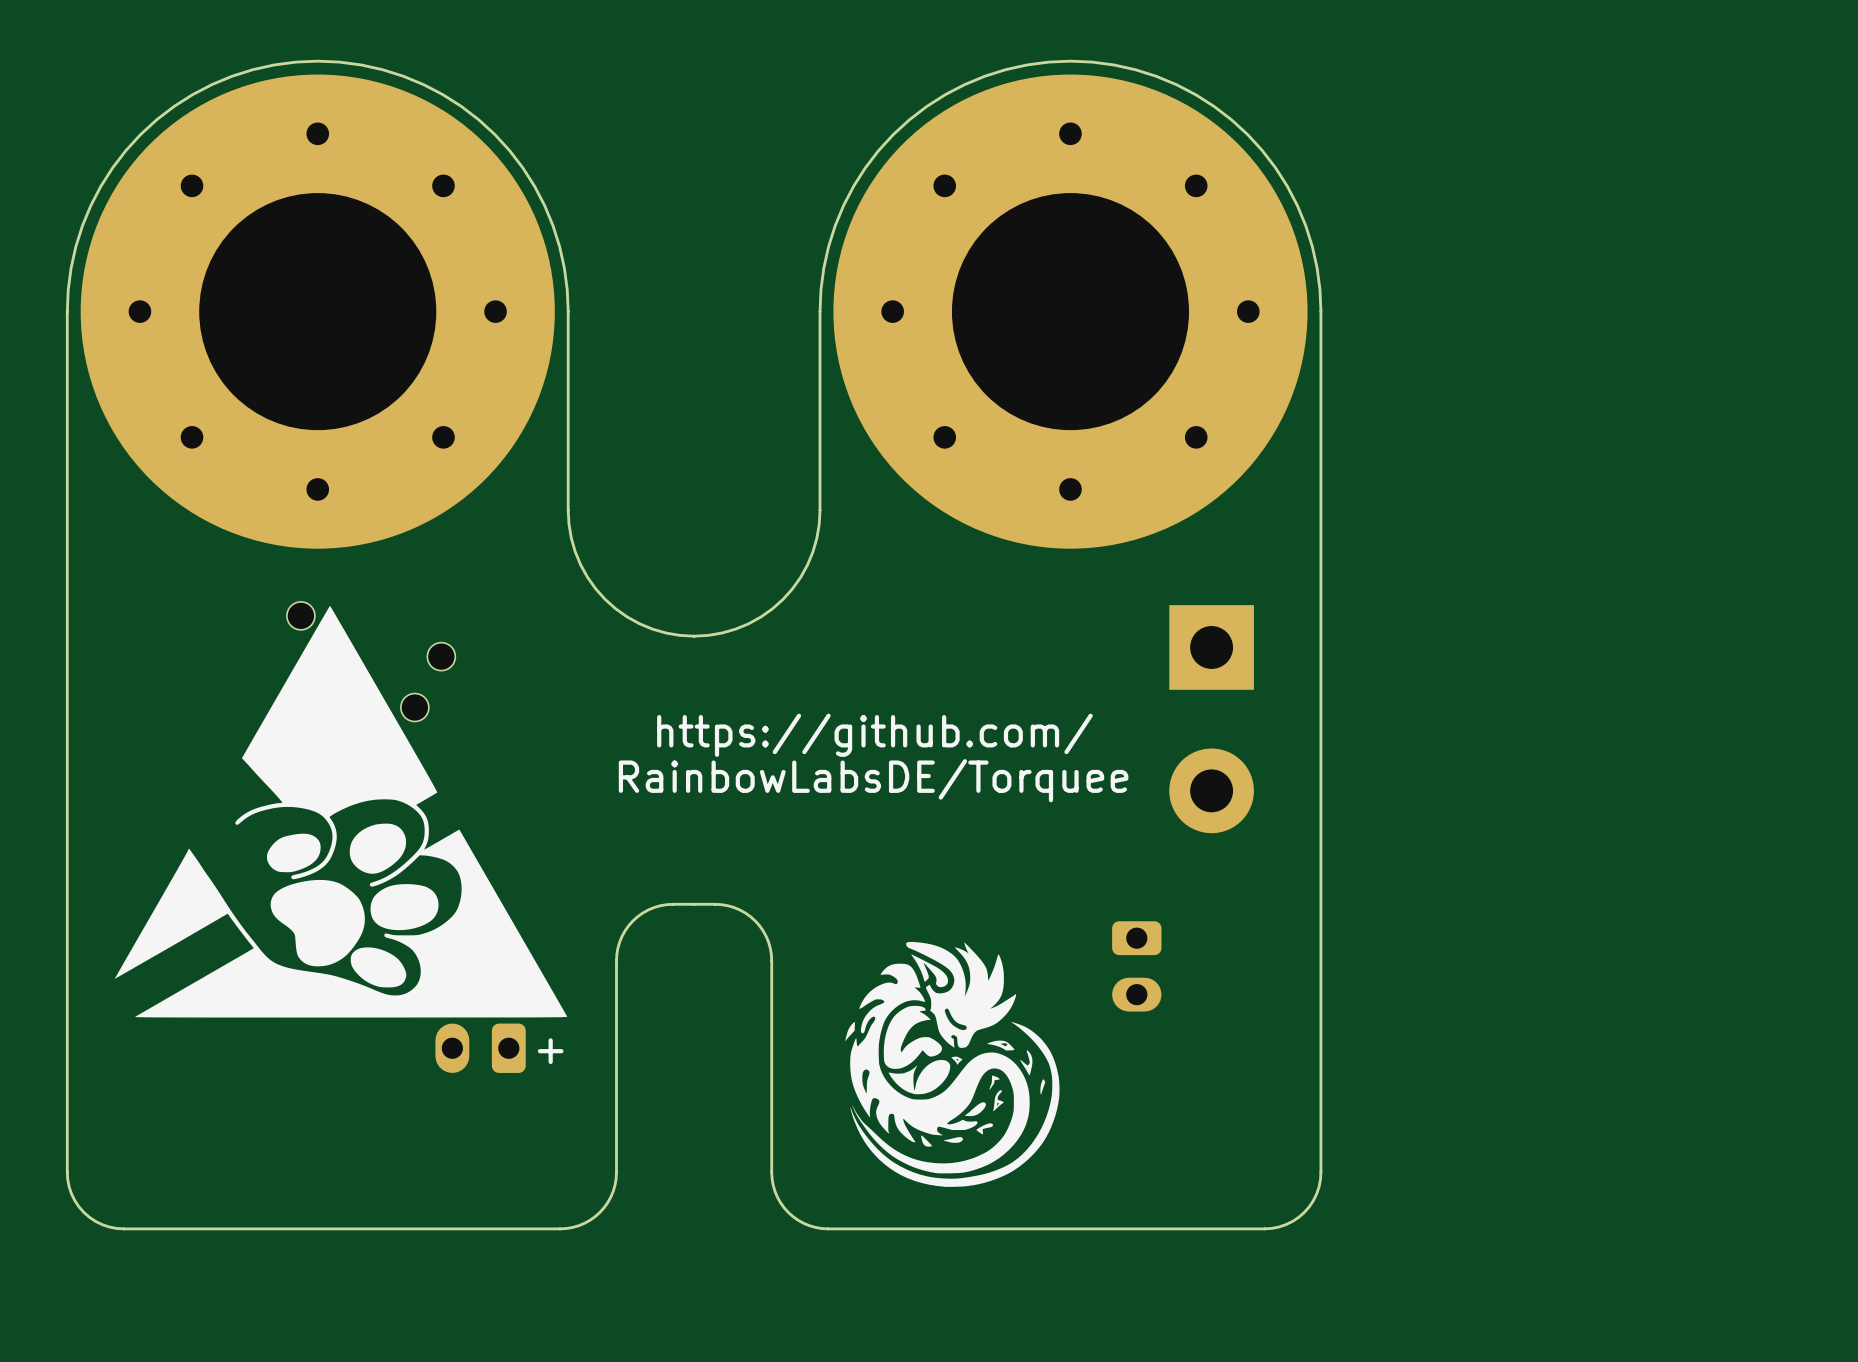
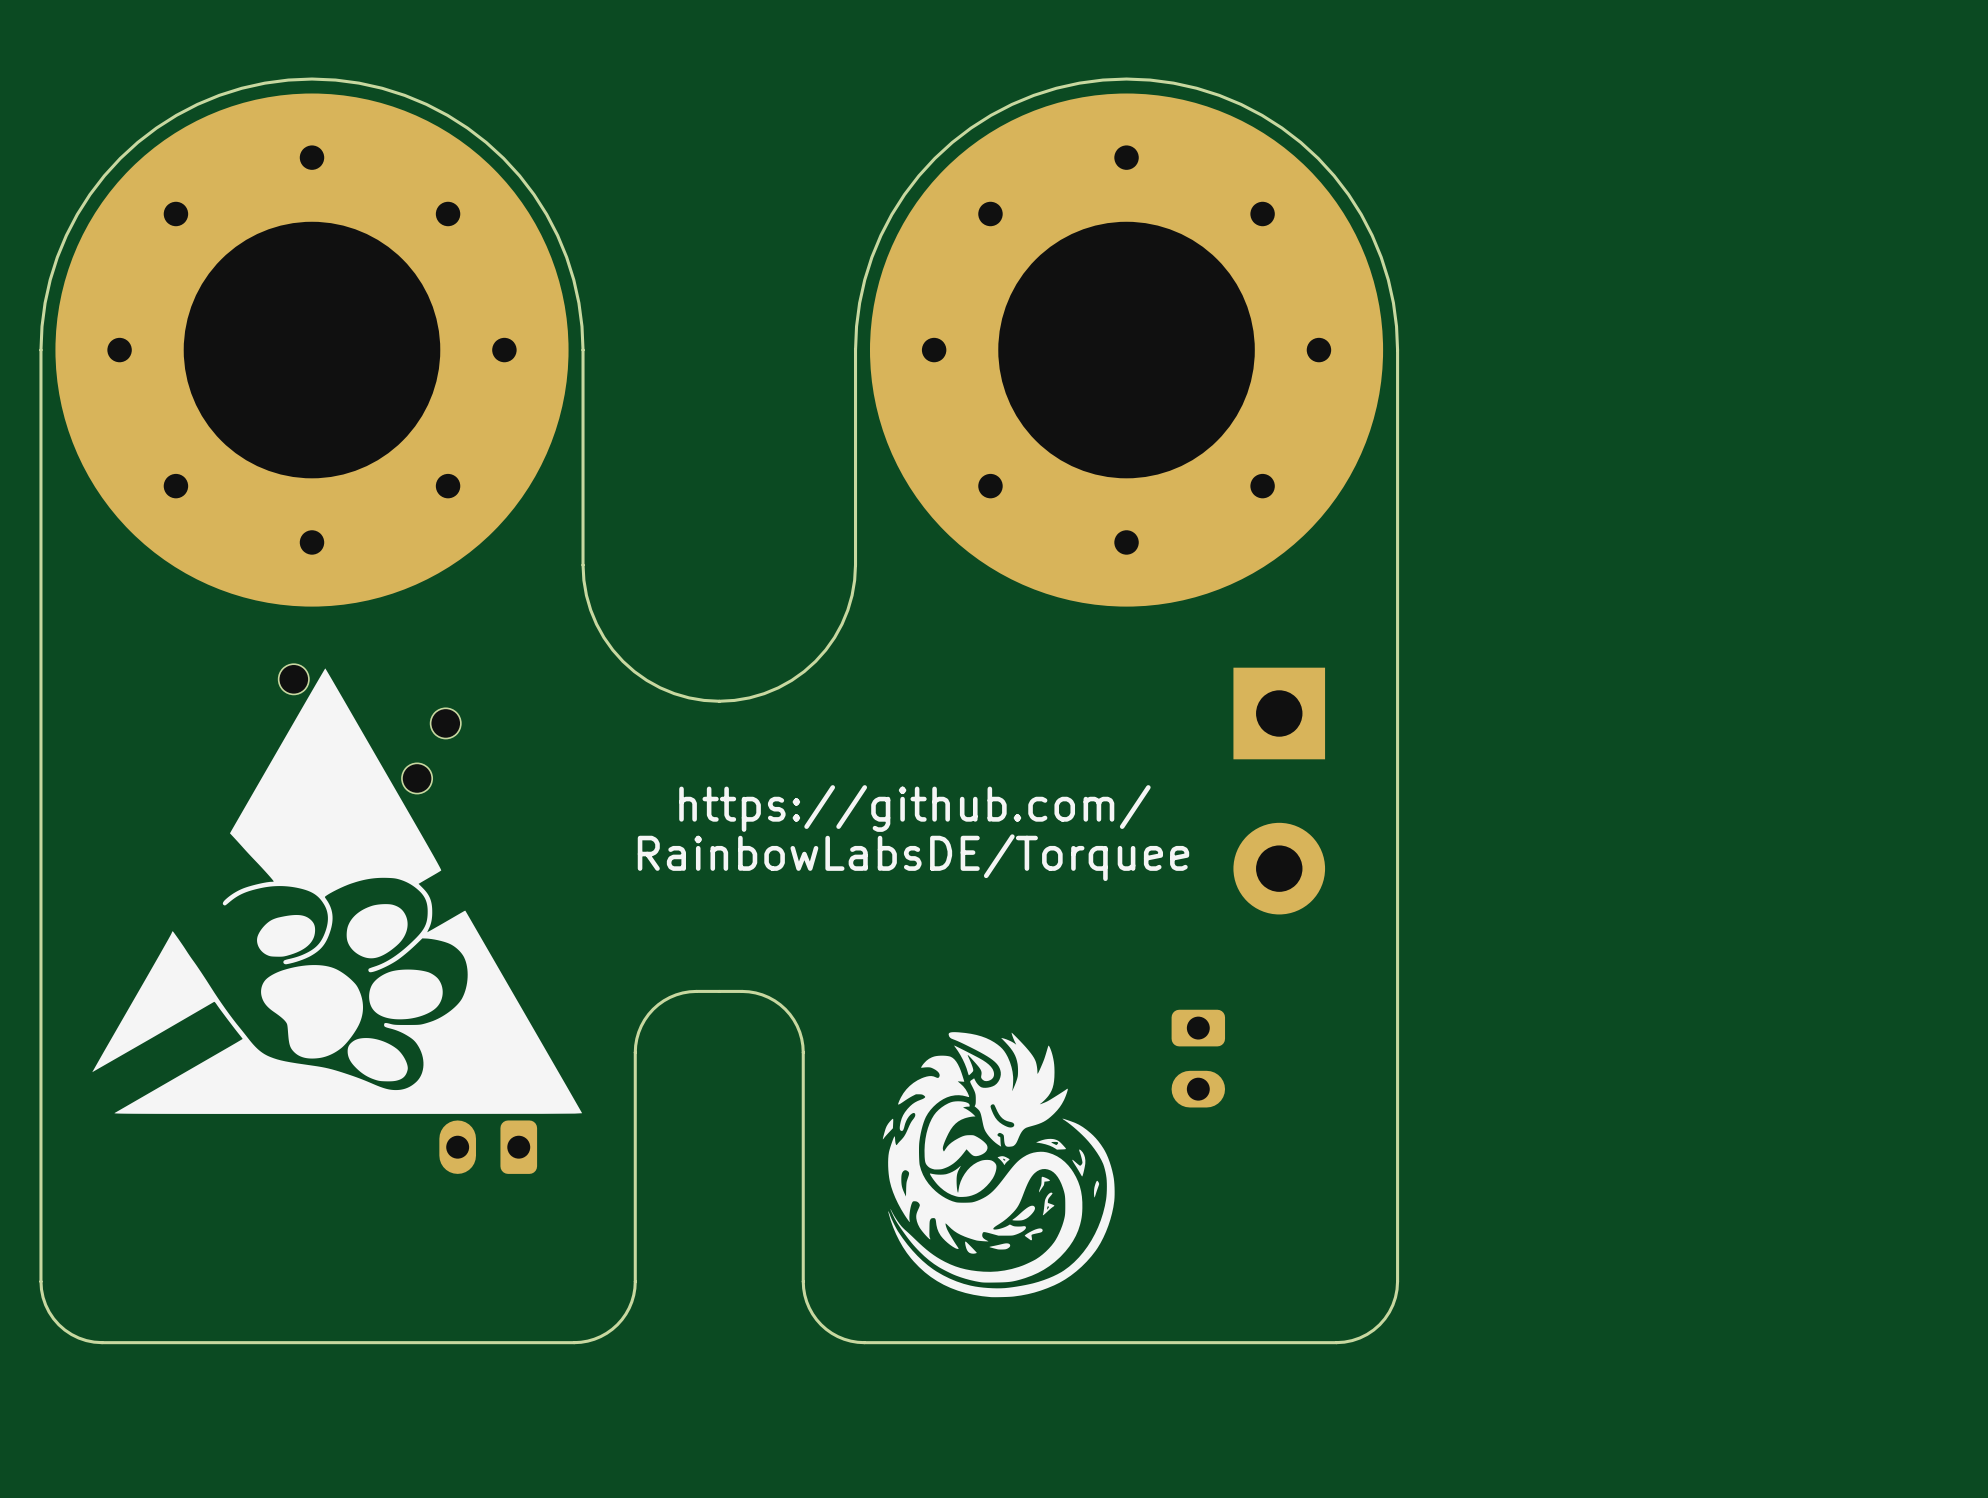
text: + (550, 1051) -> none

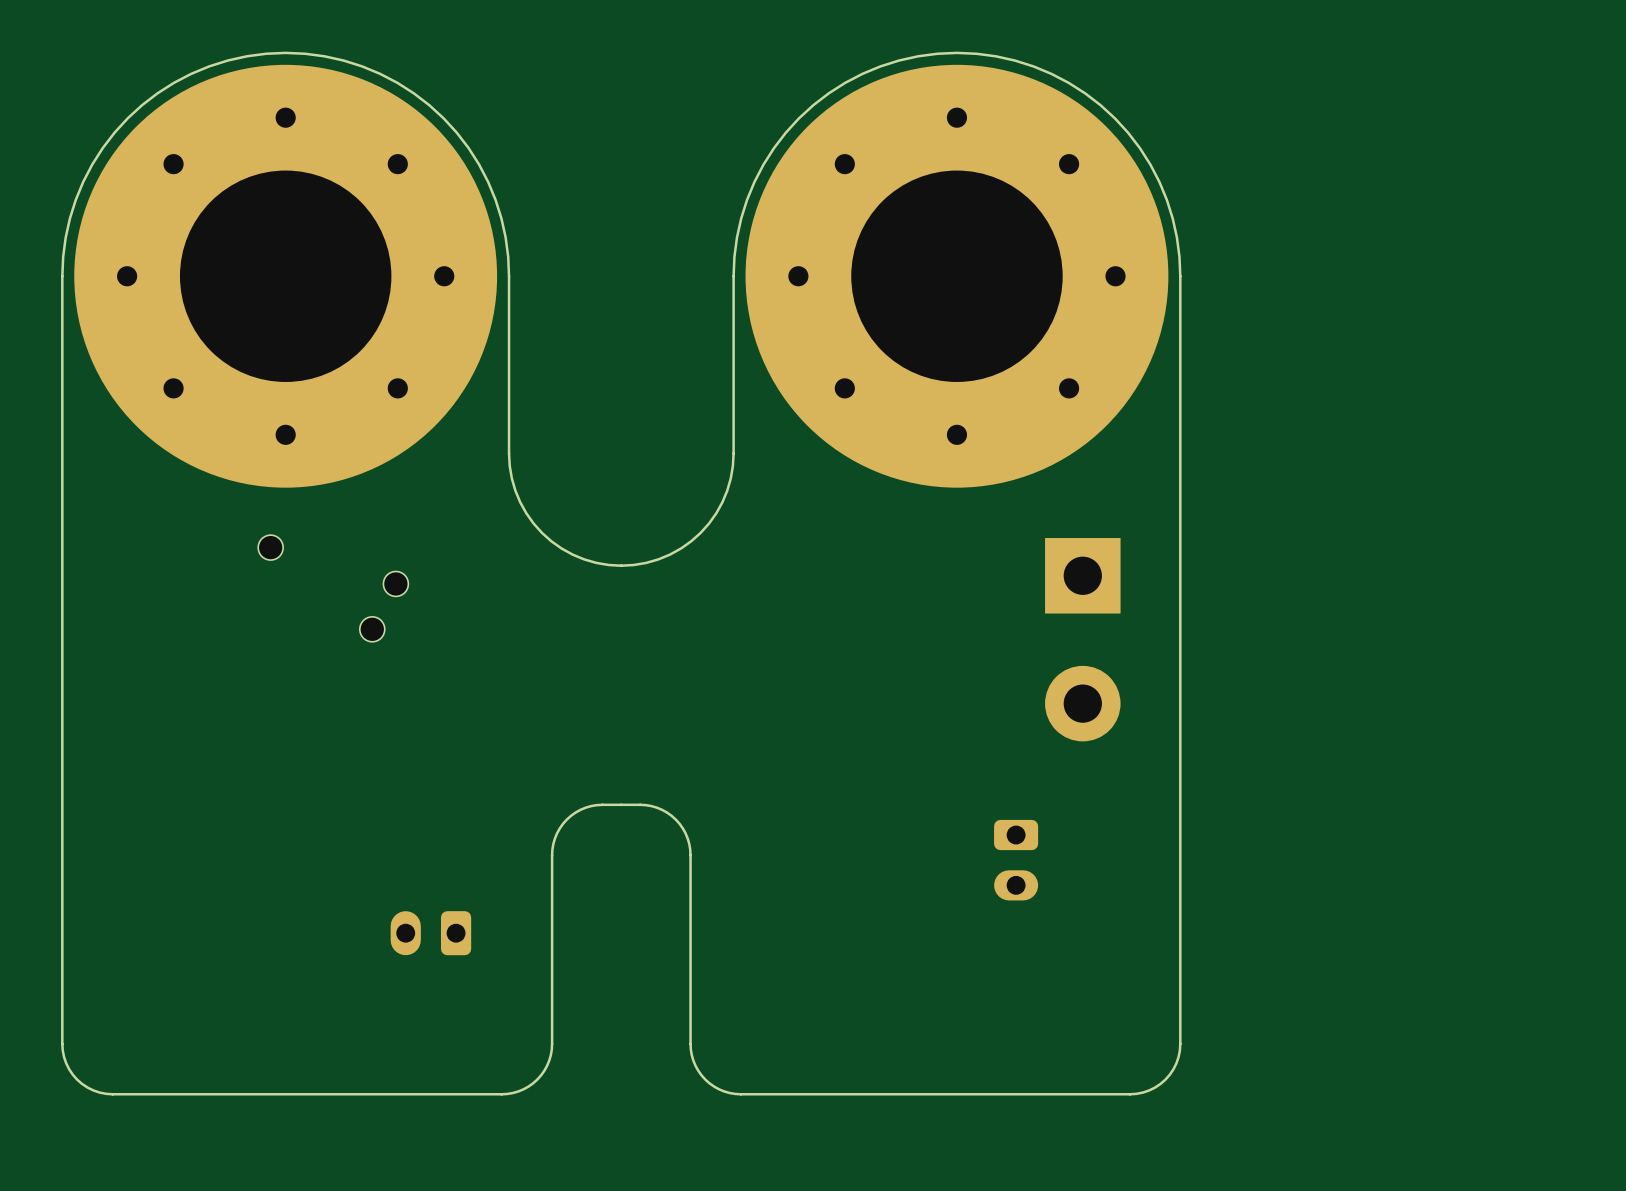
drawing: [92, 668, 583, 1114] -> none
text: https://github.com/ (914, 808) -> none
text: RainbowLabsDE/Torquee (913, 857) -> none
drawing: [882, 1032, 1115, 1298] -> none

